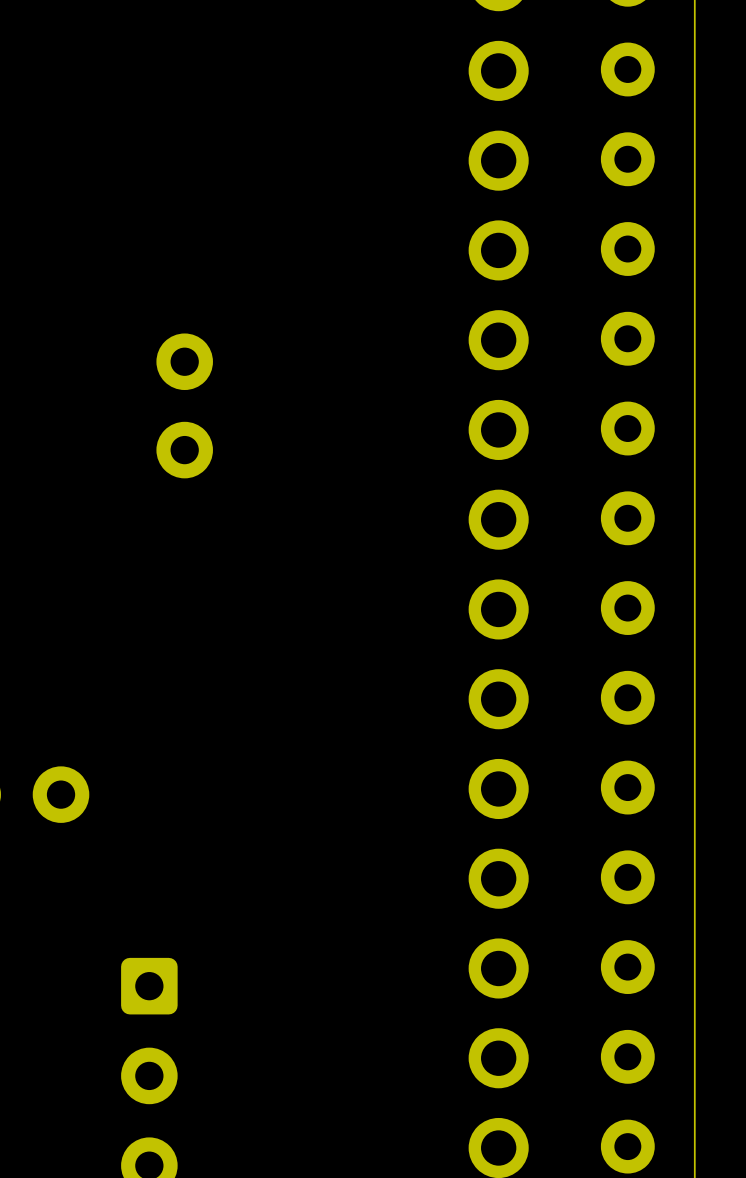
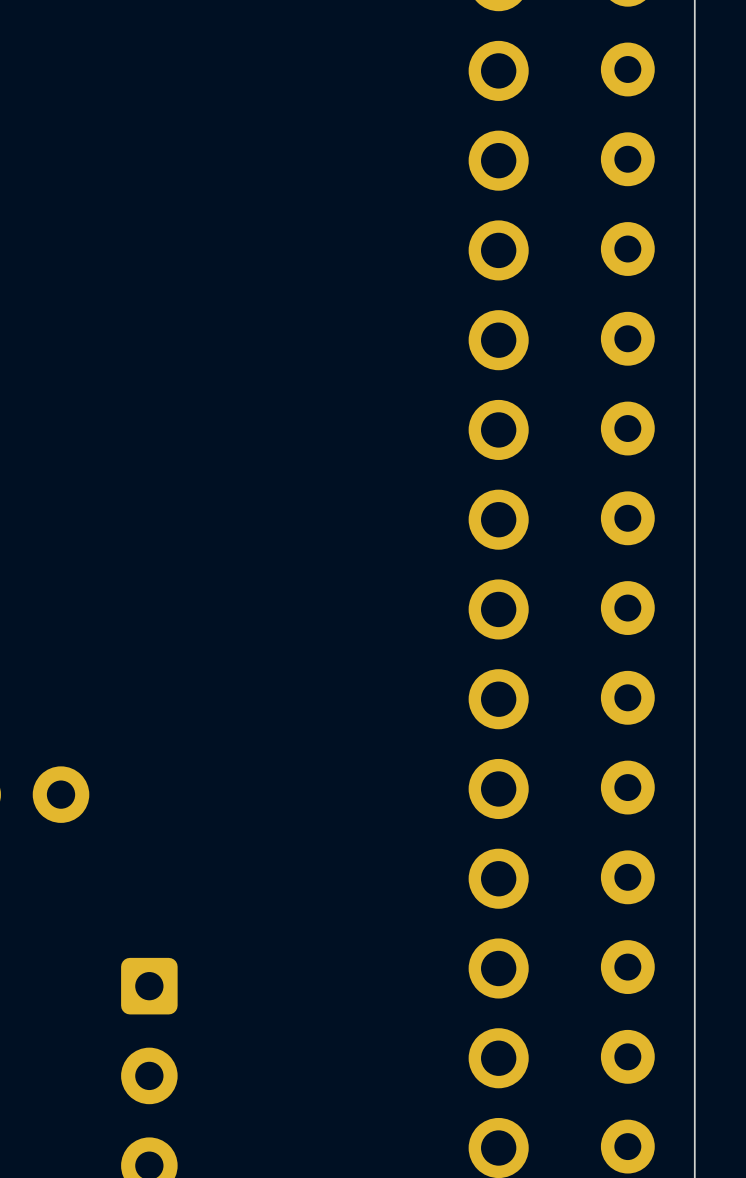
part: (184, 405) -> none

